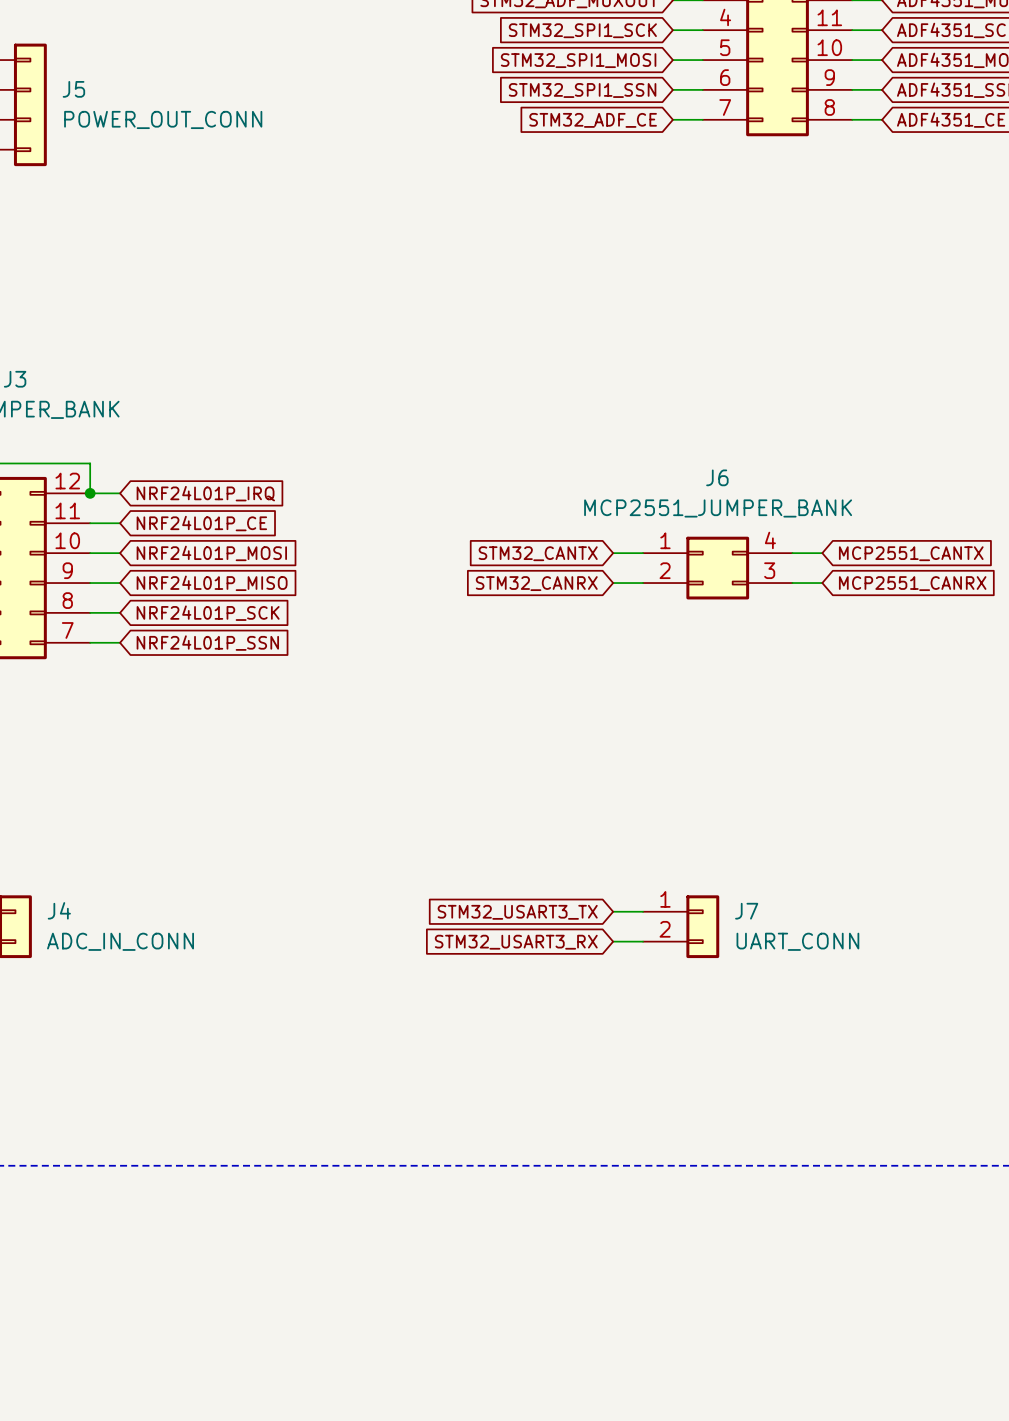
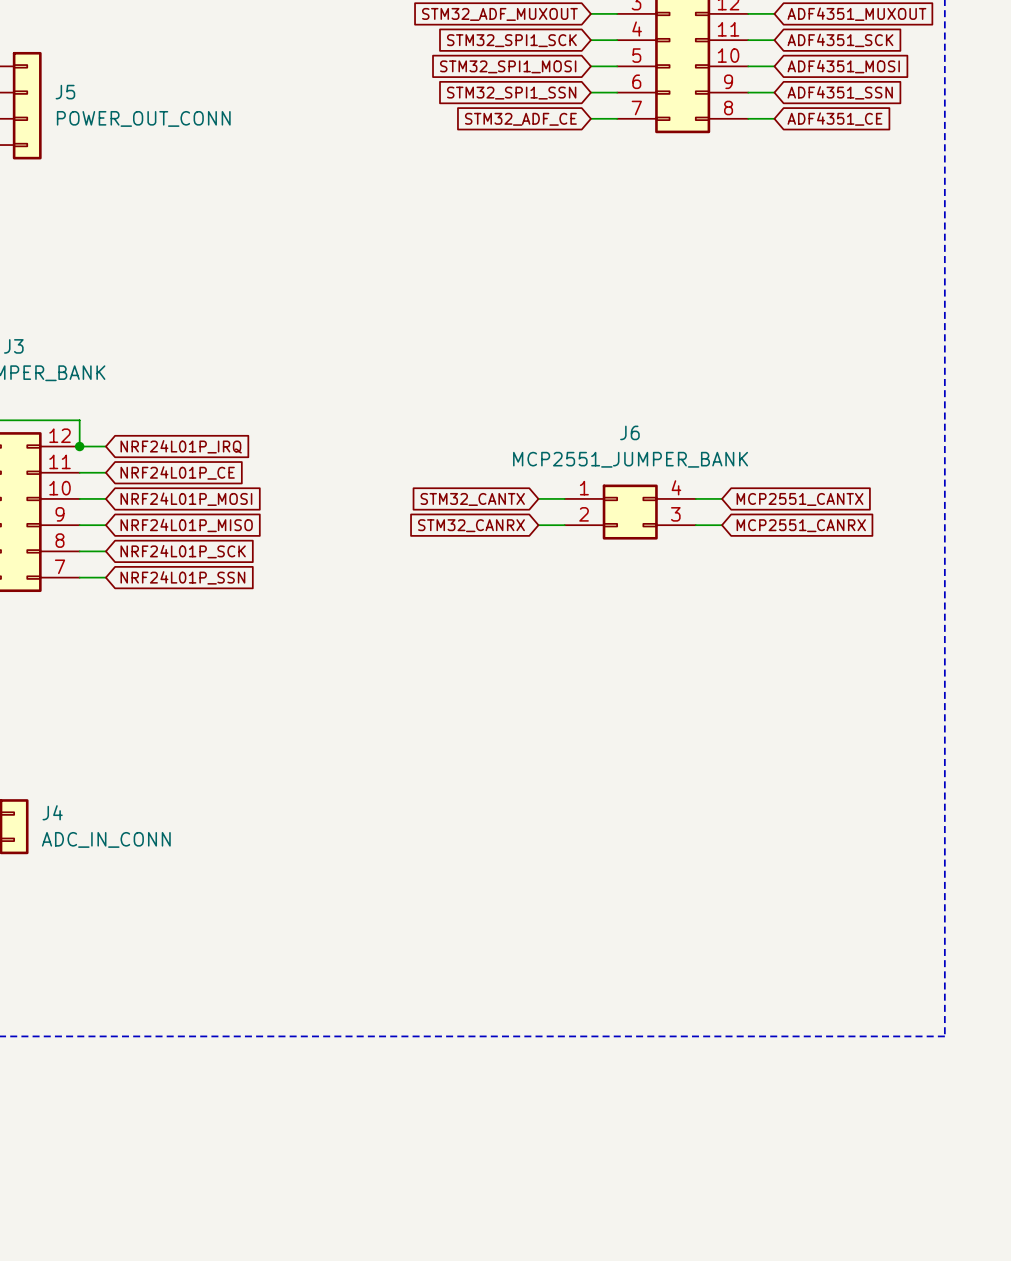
wire: (613, 911) (643, 911) -> none
global label: STM32_USART3_TX (517, 912) -> none
J7: UART_CONN (681, 926) -> none
wire: (613, 941) (643, 941) -> none
global label: STM32_USART3_RX (516, 942) -> none

